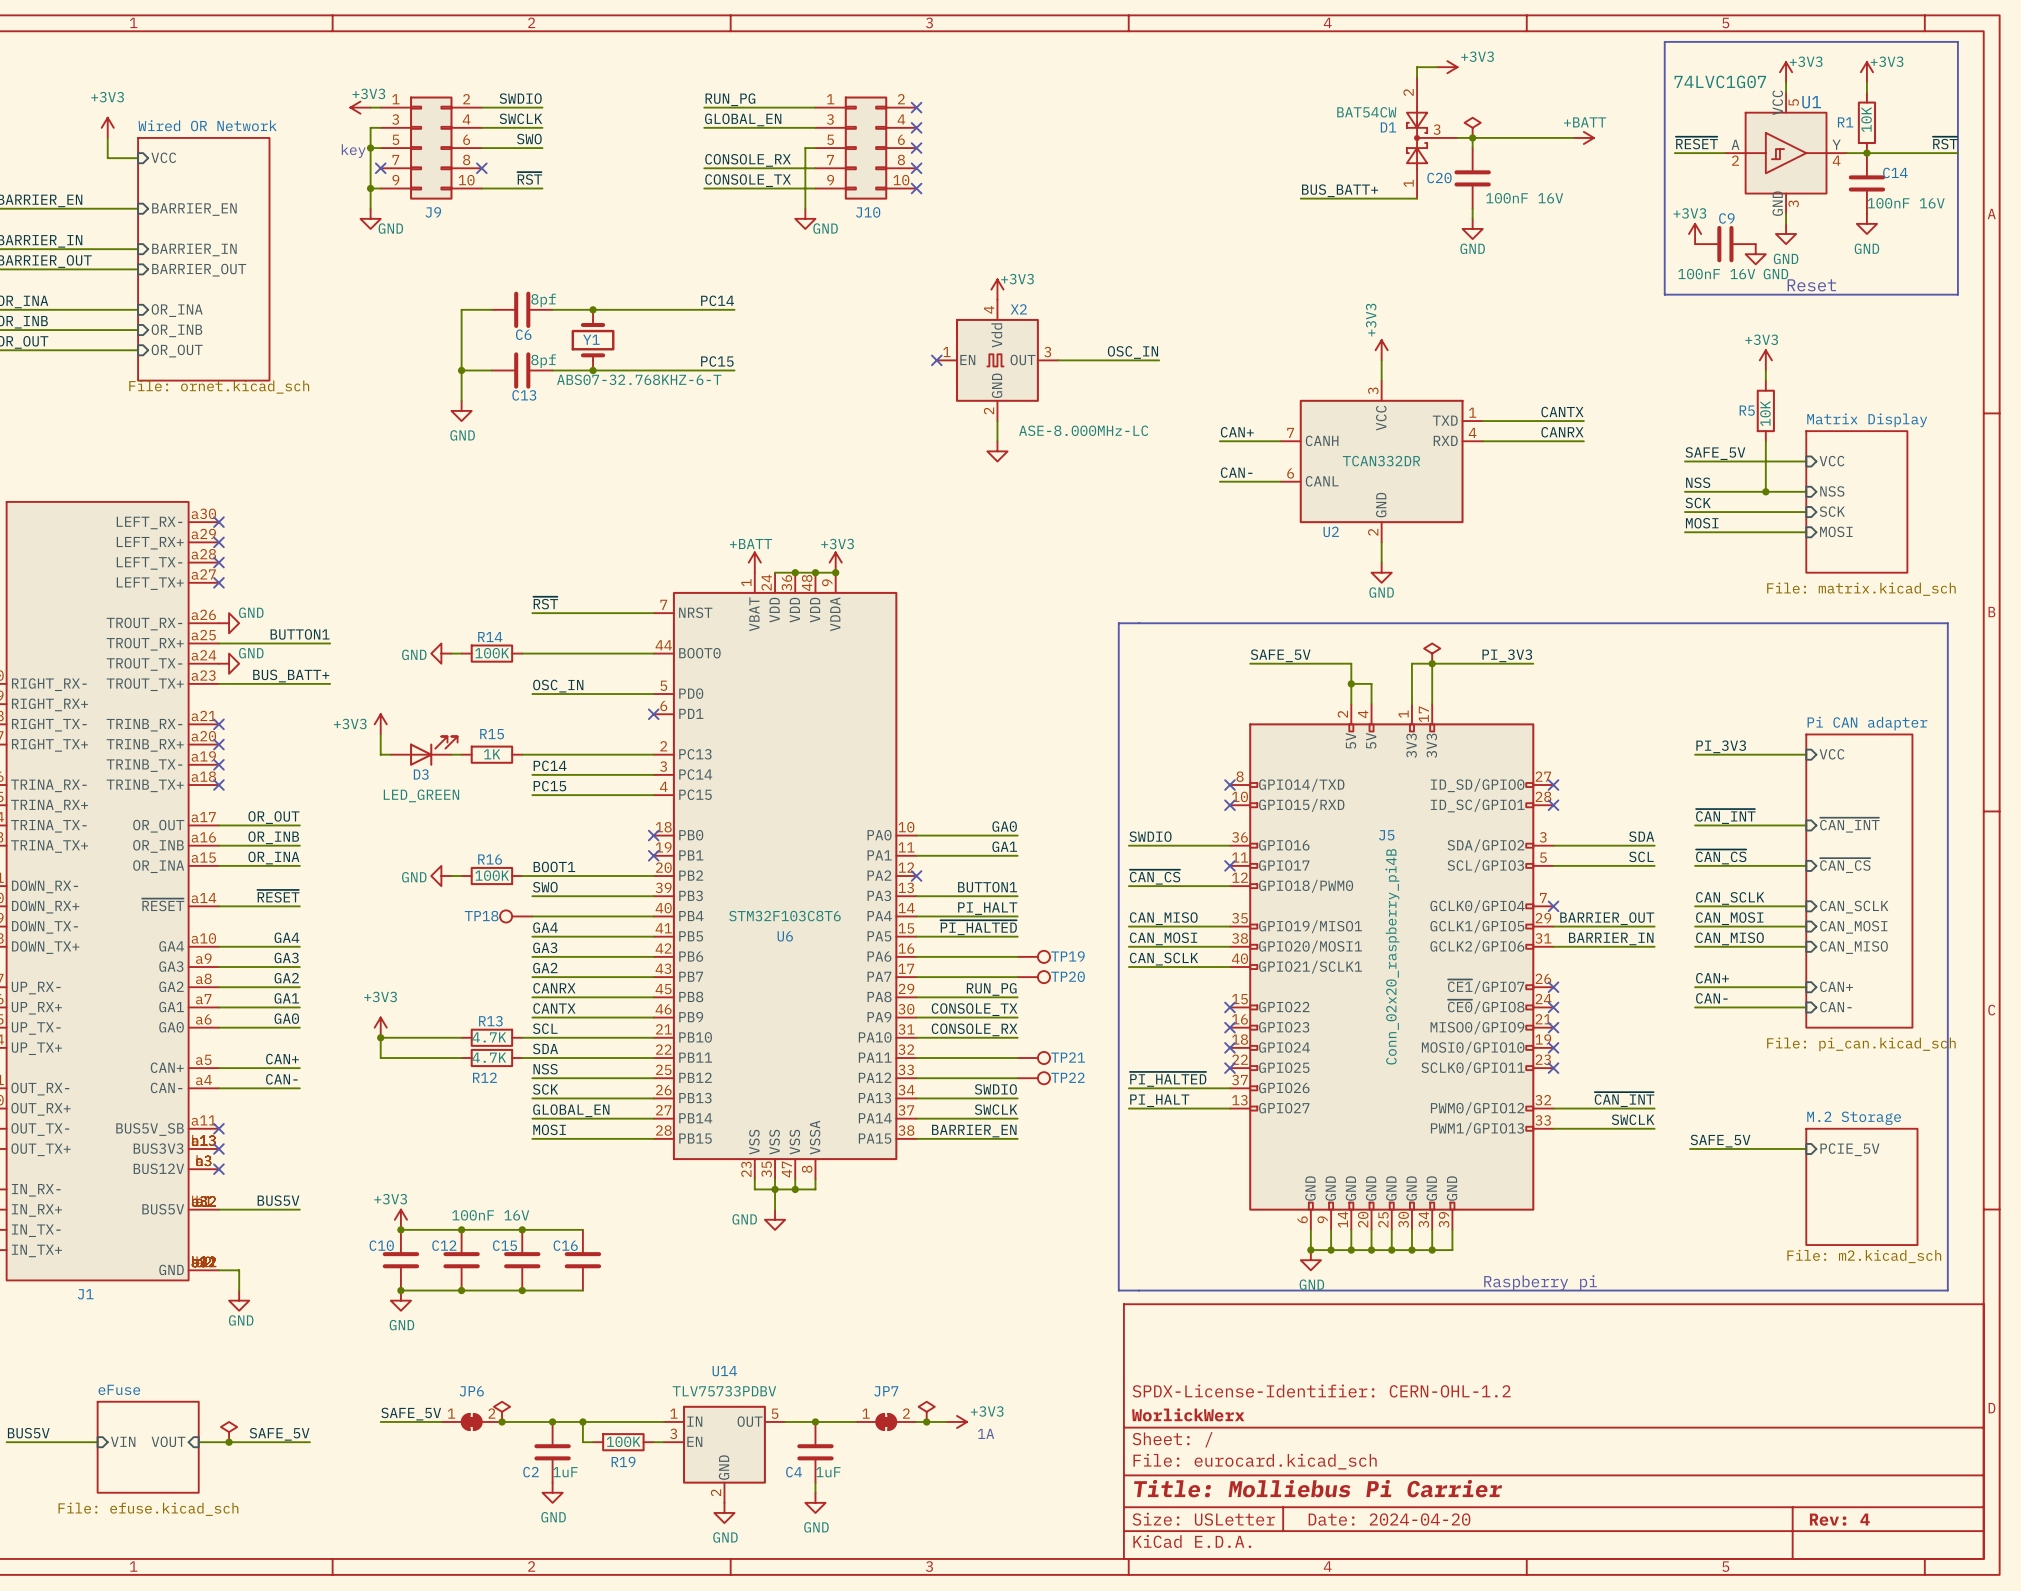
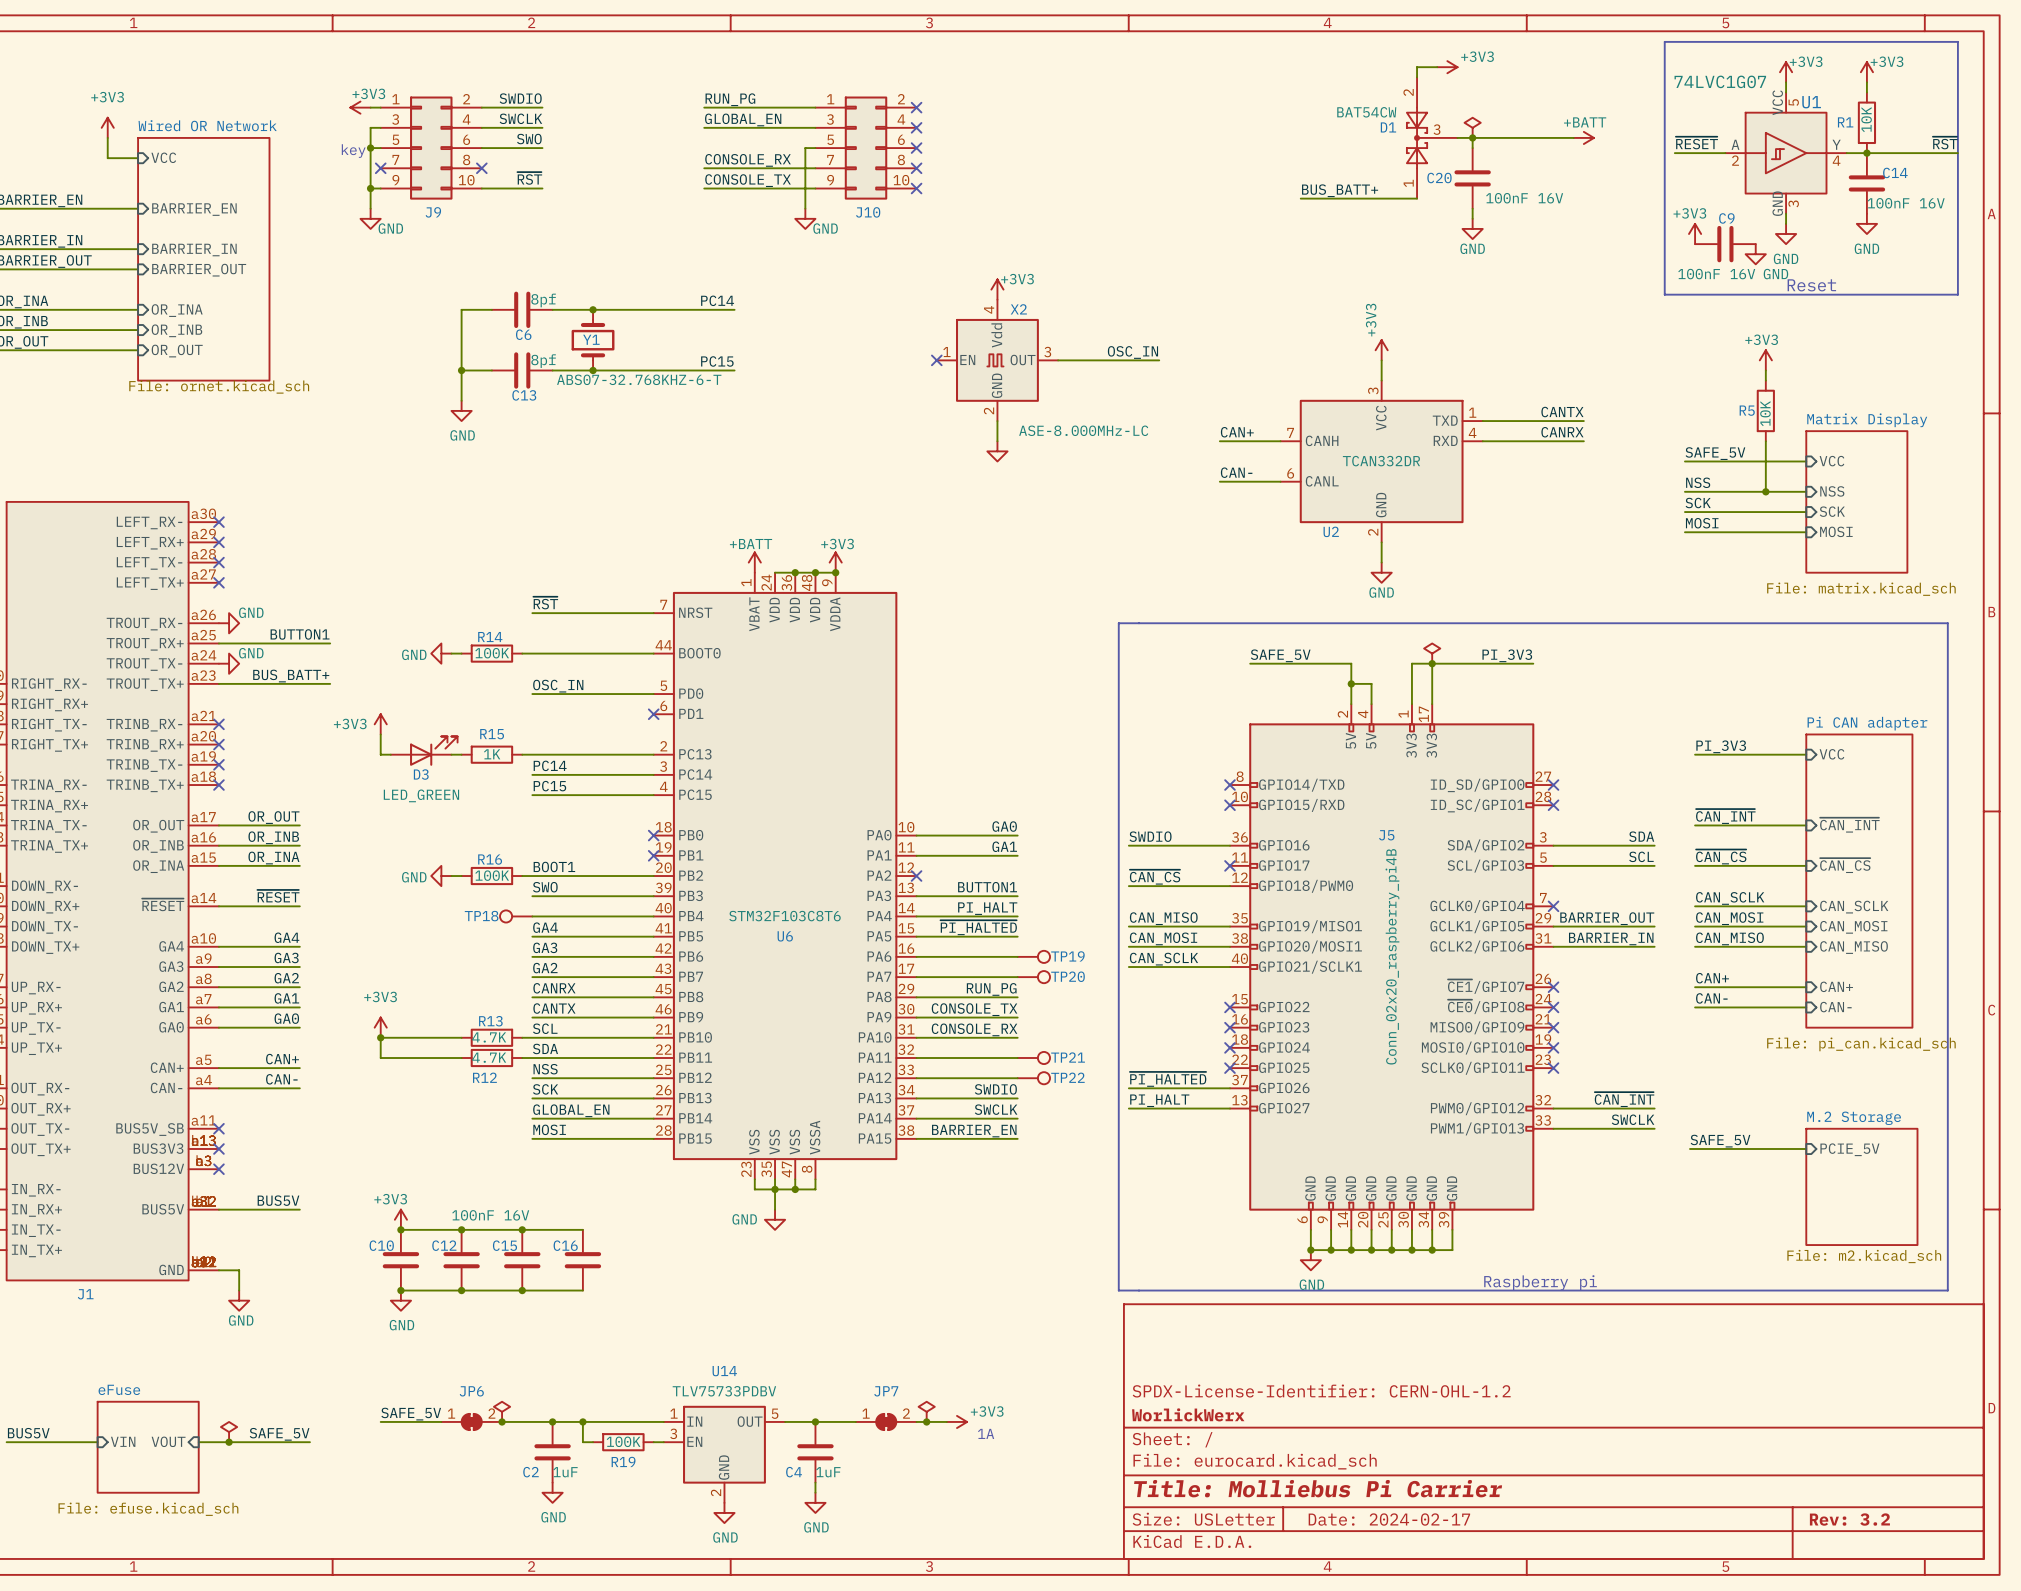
title block: Date: 2024-04-20 (1389, 1519) -> Date: 2024-02-17 (1389, 1519)
title block: Rev: 4 (1839, 1519) -> Rev: 3.2 (1849, 1519)

